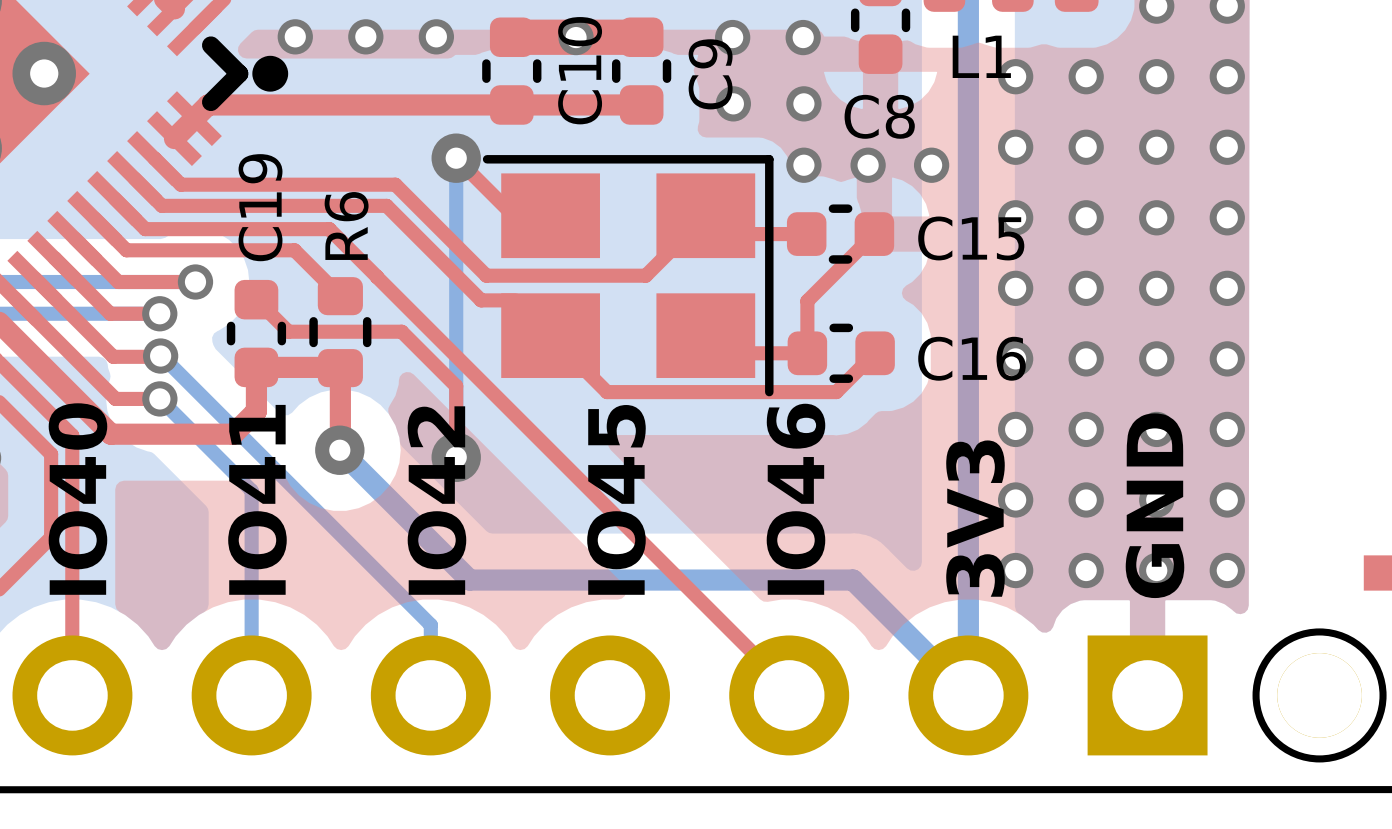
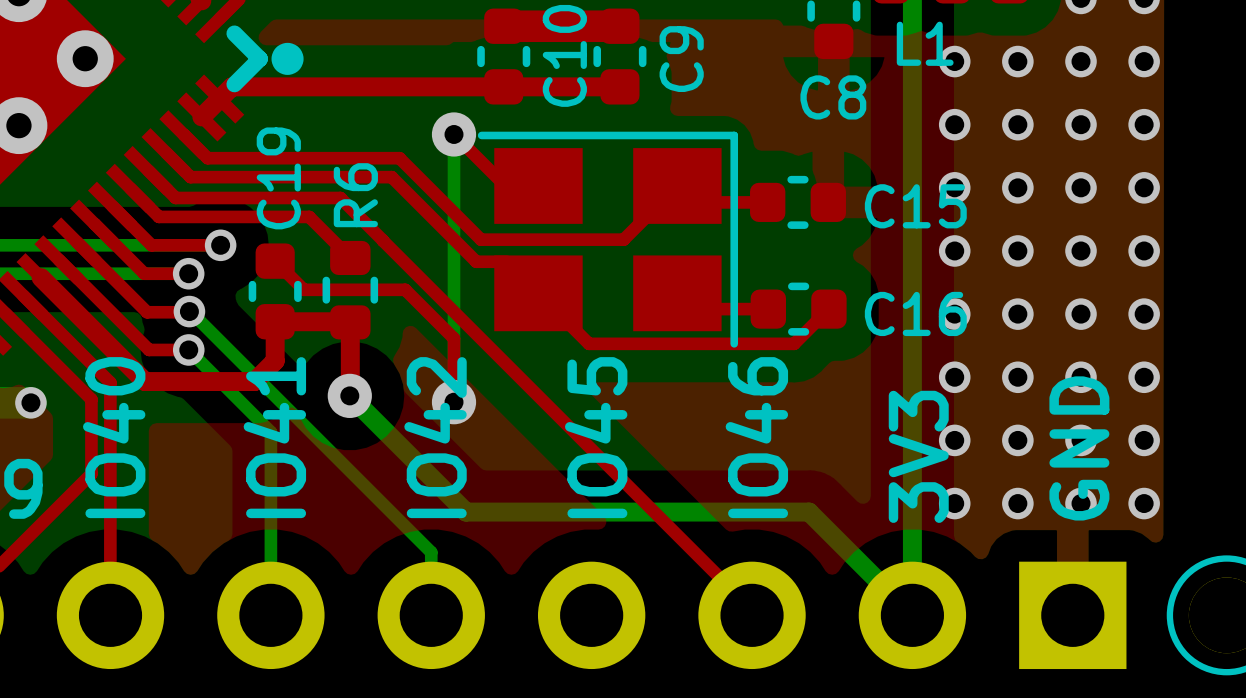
via: (295, 36) -> none
via: (365, 36) -> none
via: (436, 36) -> none
via: (576, 37) -> none
via: (732, 37) -> none
via: (803, 37) -> none
via: (733, 103) -> none
via: (803, 103) -> none
via: (803, 165) -> none
via: (868, 165) -> none
via: (931, 165) -> none
top track: (874, 234) (807, 301) (807, 353) -> none

